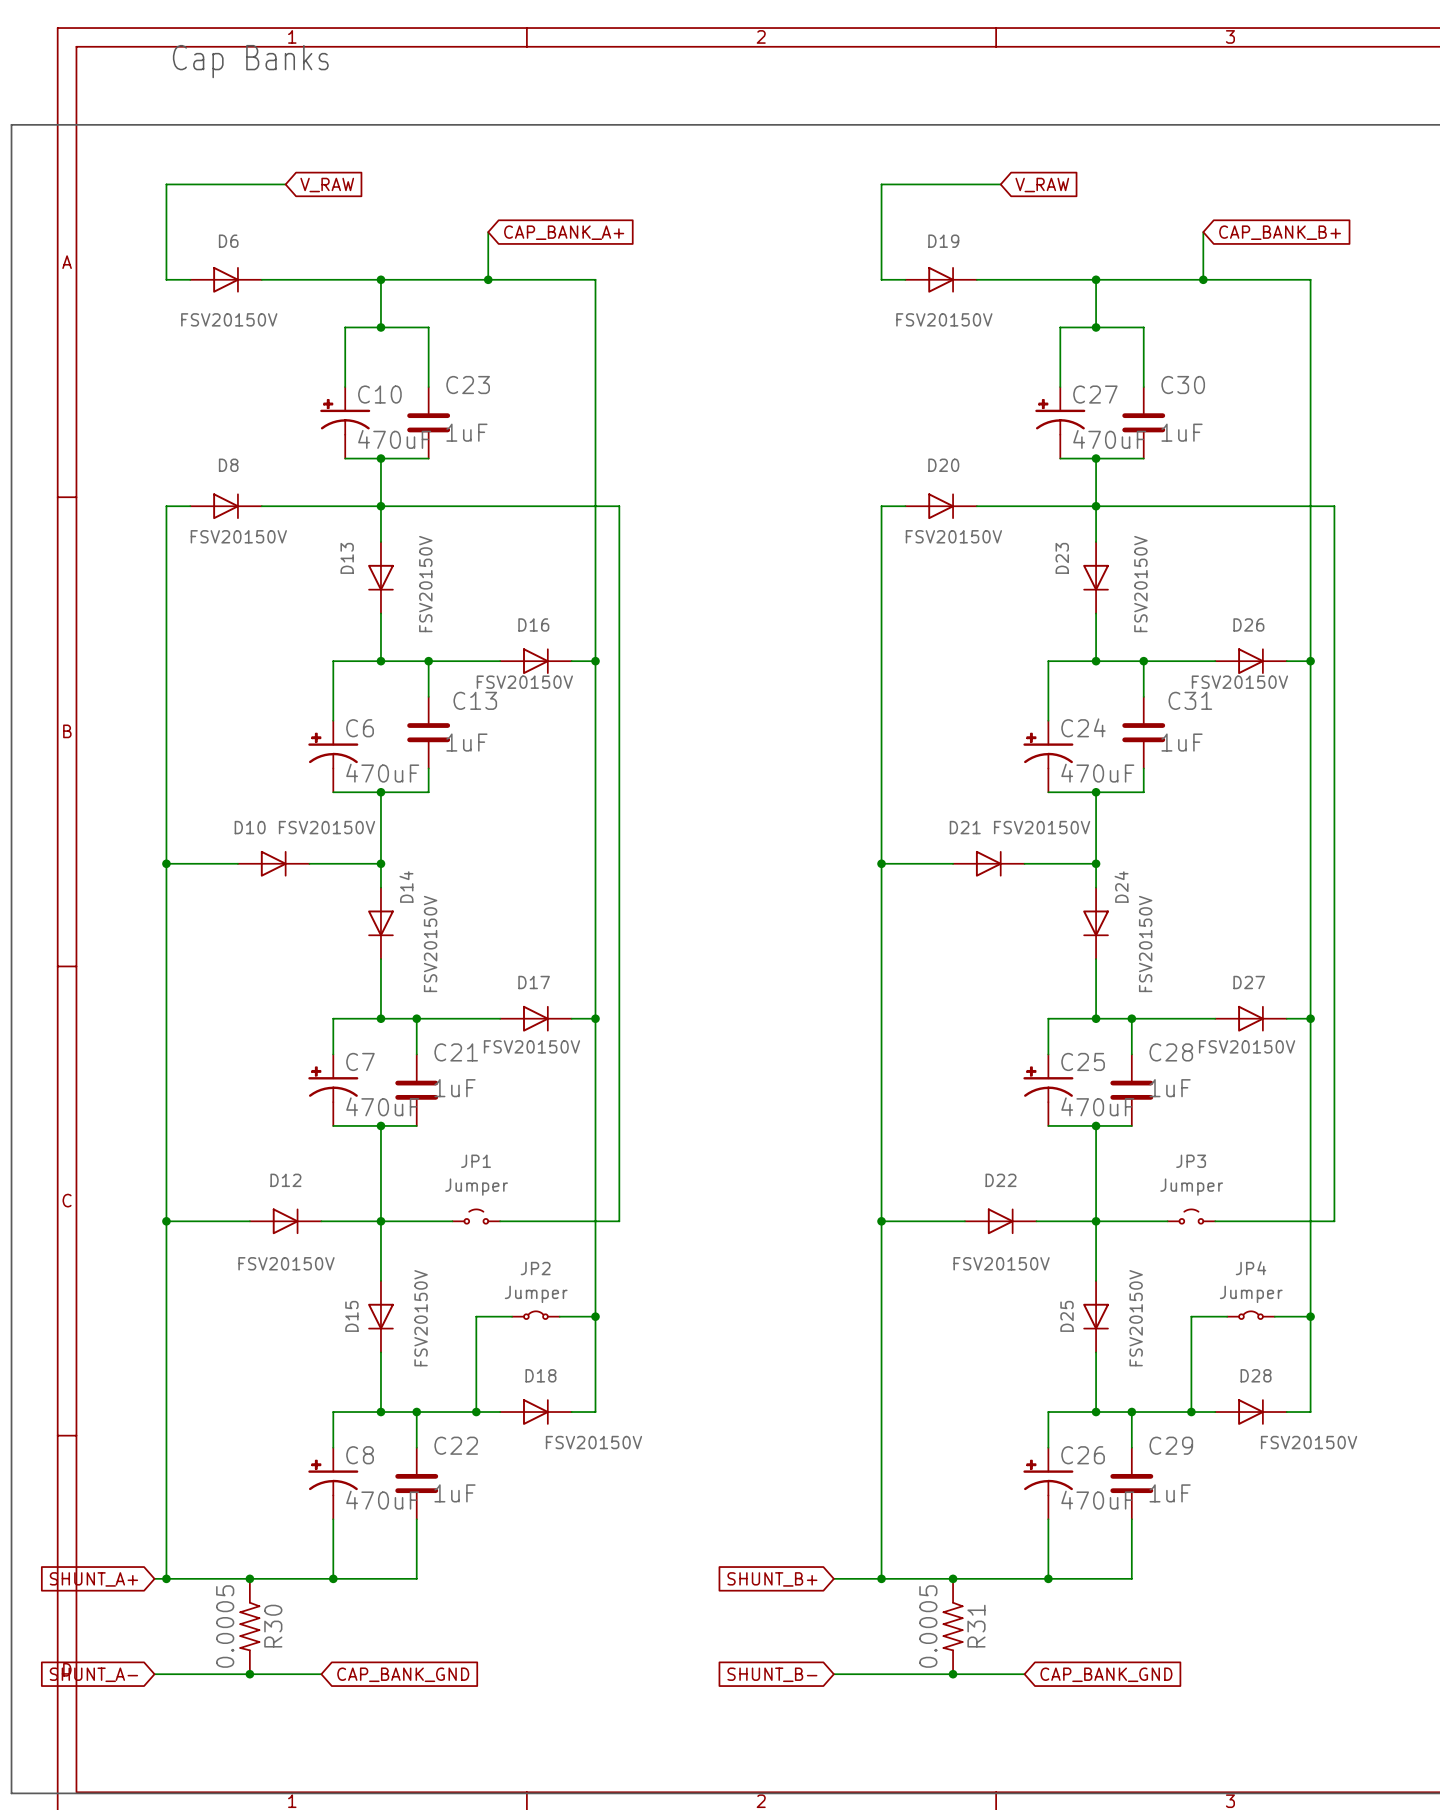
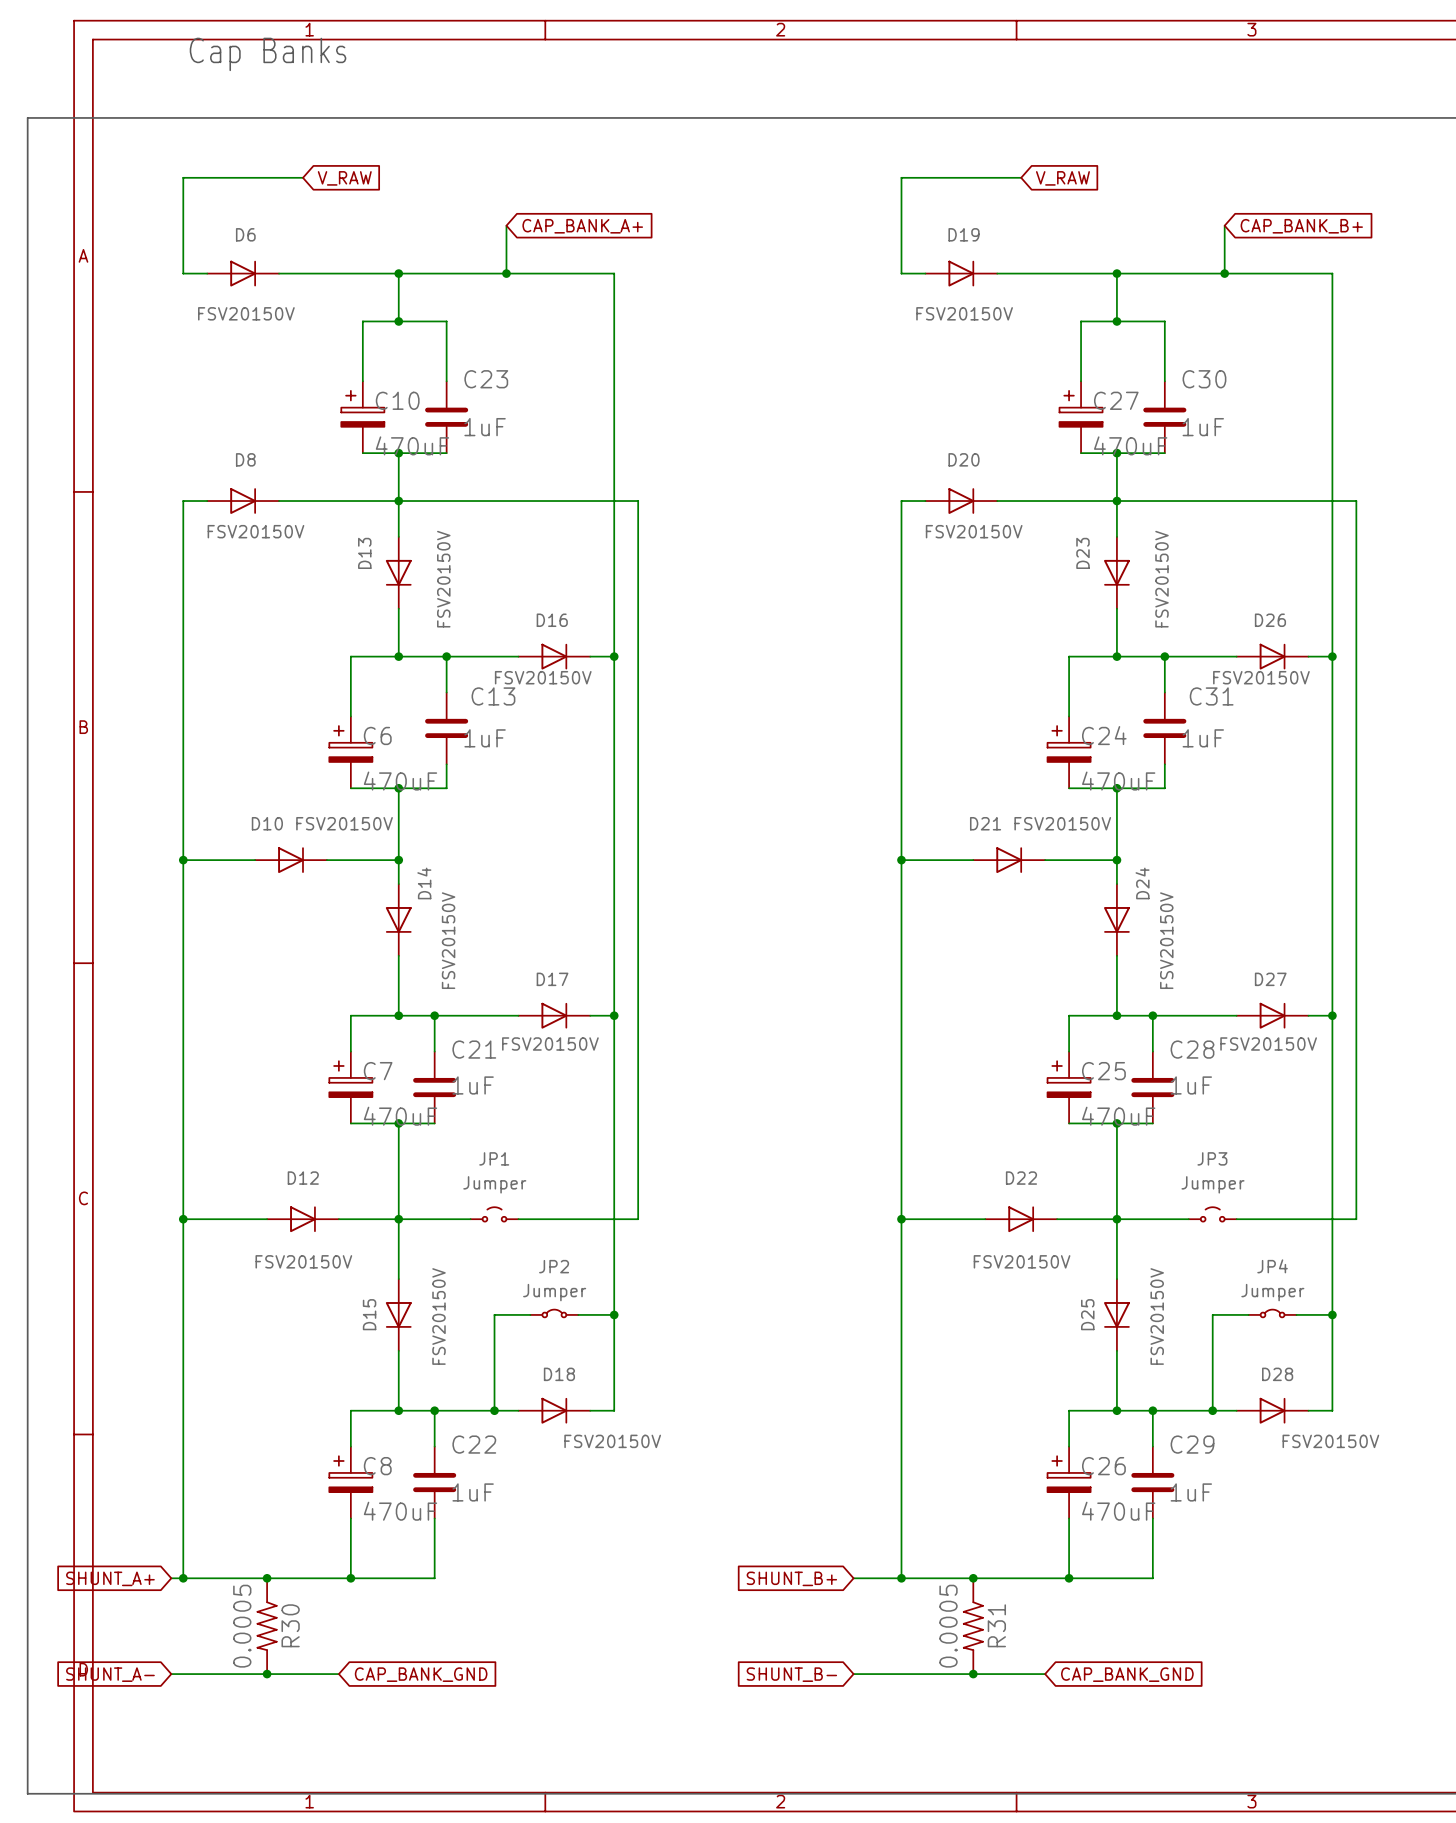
C10 symbol: [320, 387, 371, 459] -> [341, 381, 385, 454]
C27 symbol: [1035, 387, 1086, 459] -> [1059, 381, 1103, 454]
C6 symbol: [308, 720, 359, 793] -> [329, 716, 373, 789]
C24 symbol: [1023, 720, 1074, 793] -> [1047, 716, 1091, 789]
C7 symbol: [308, 1054, 359, 1126] -> [329, 1051, 373, 1124]
C25 symbol: [1023, 1054, 1074, 1126] -> [1047, 1051, 1091, 1124]
C8 symbol: [308, 1447, 359, 1520] -> [329, 1446, 373, 1519]
C26 symbol: [1023, 1447, 1074, 1520] -> [1047, 1446, 1091, 1519]

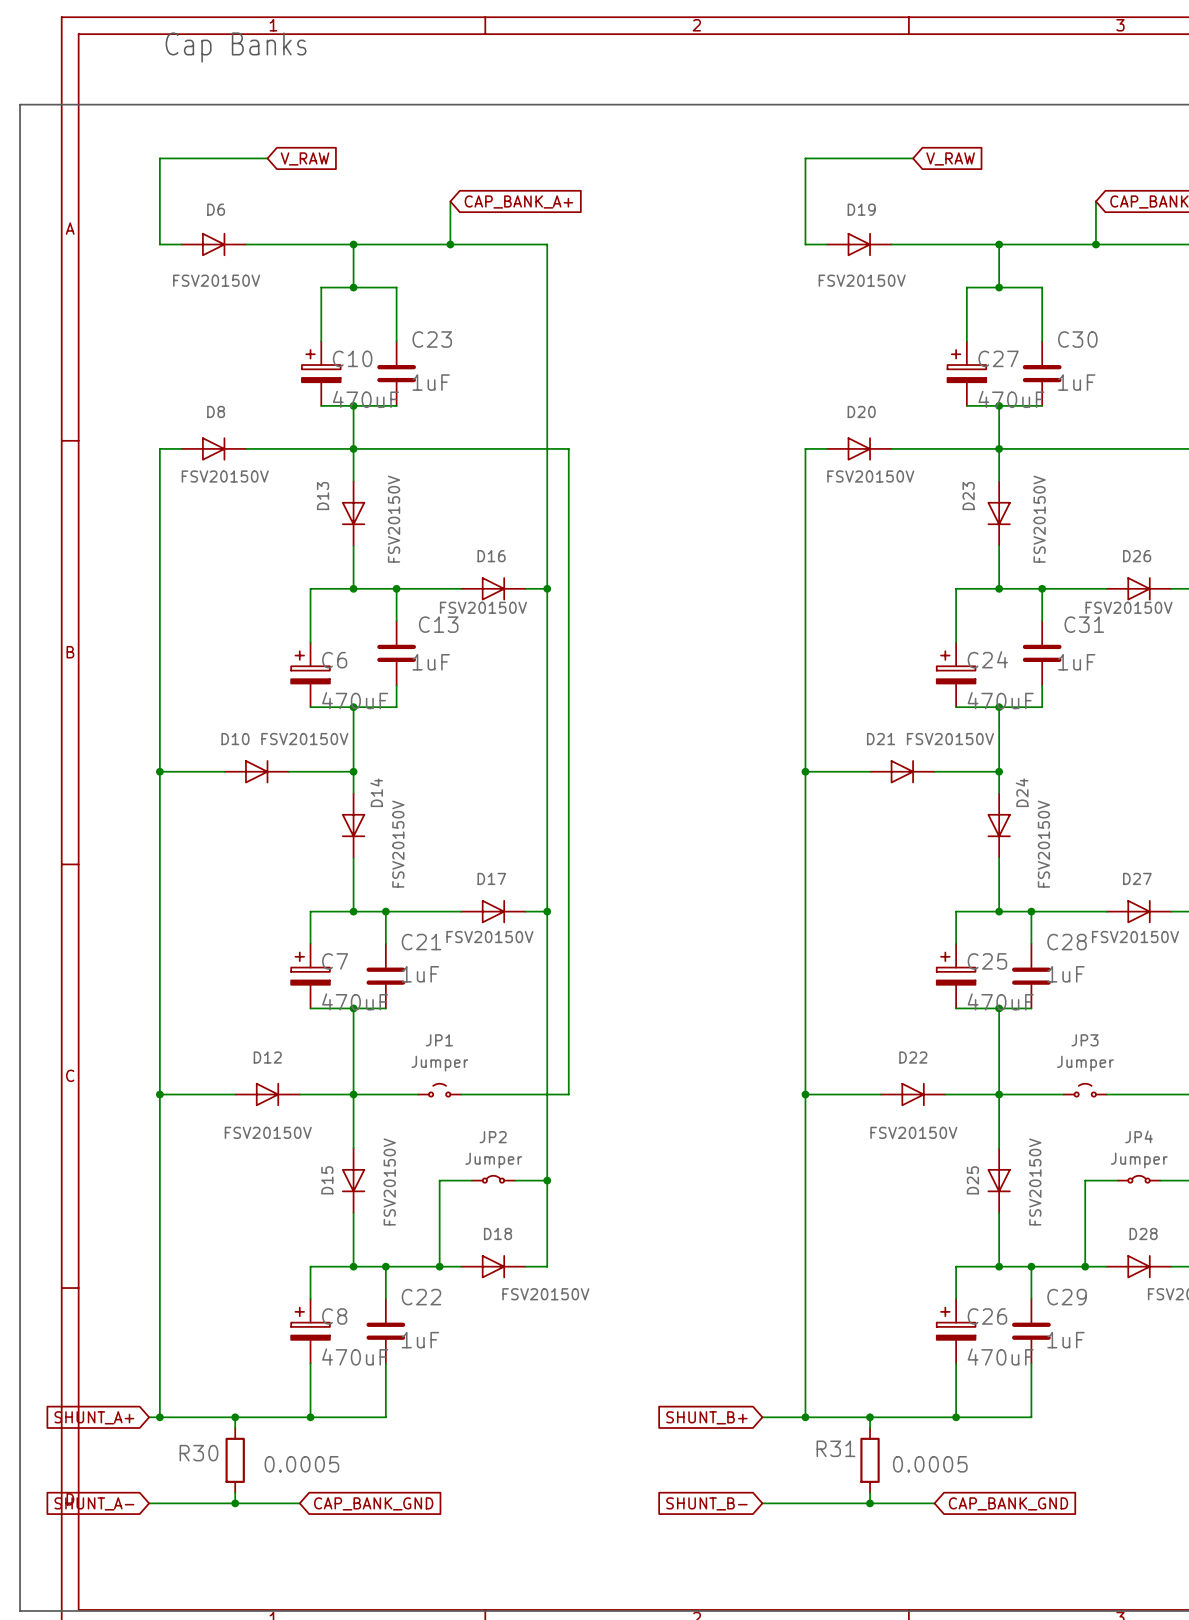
R30 symbol: [256, 1578, 278, 1675] -> [225, 1428, 245, 1493]
R31 symbol: [963, 1578, 984, 1675] -> [860, 1428, 880, 1493]
R30 name position: R30 (290, 1625) -> R30 (198, 1453)
R31 name position: R31 (996, 1625) -> R31 (835, 1448)
R30 value position: 0.0005 (242, 1626) -> 0.0005 (301, 1464)
R31 value position: 0.0005 (948, 1626) -> 0.0005 (930, 1464)

